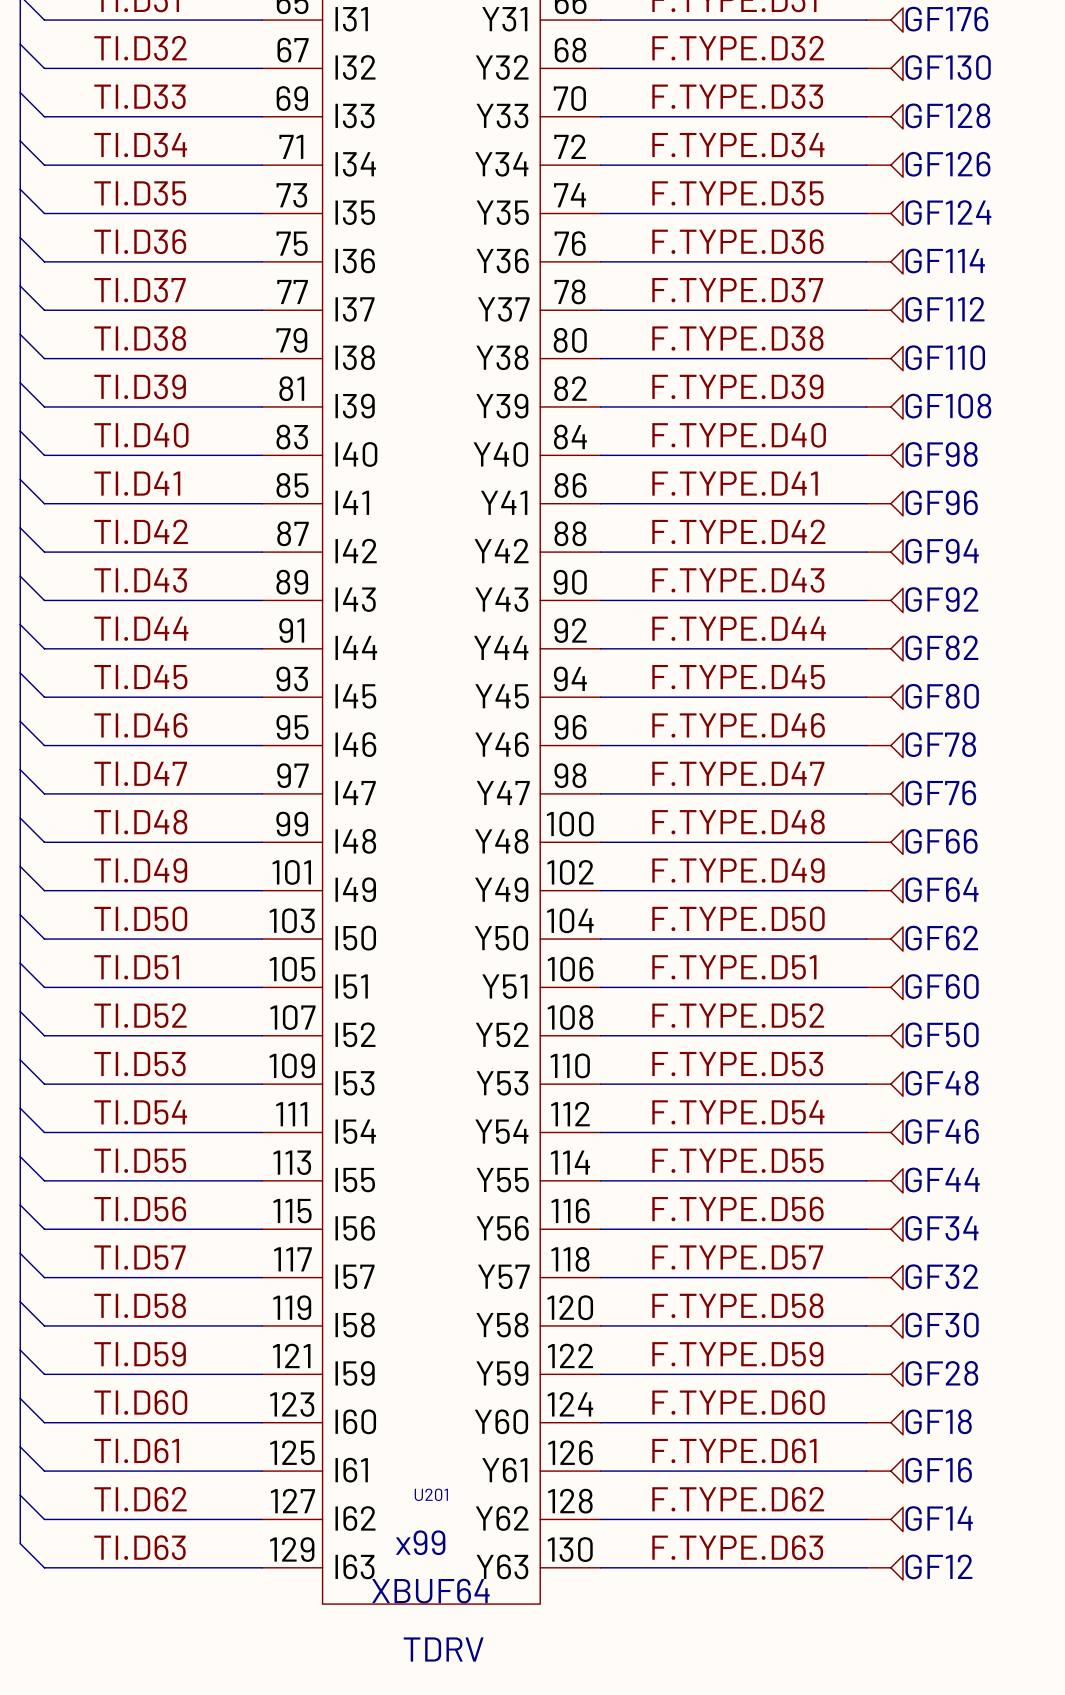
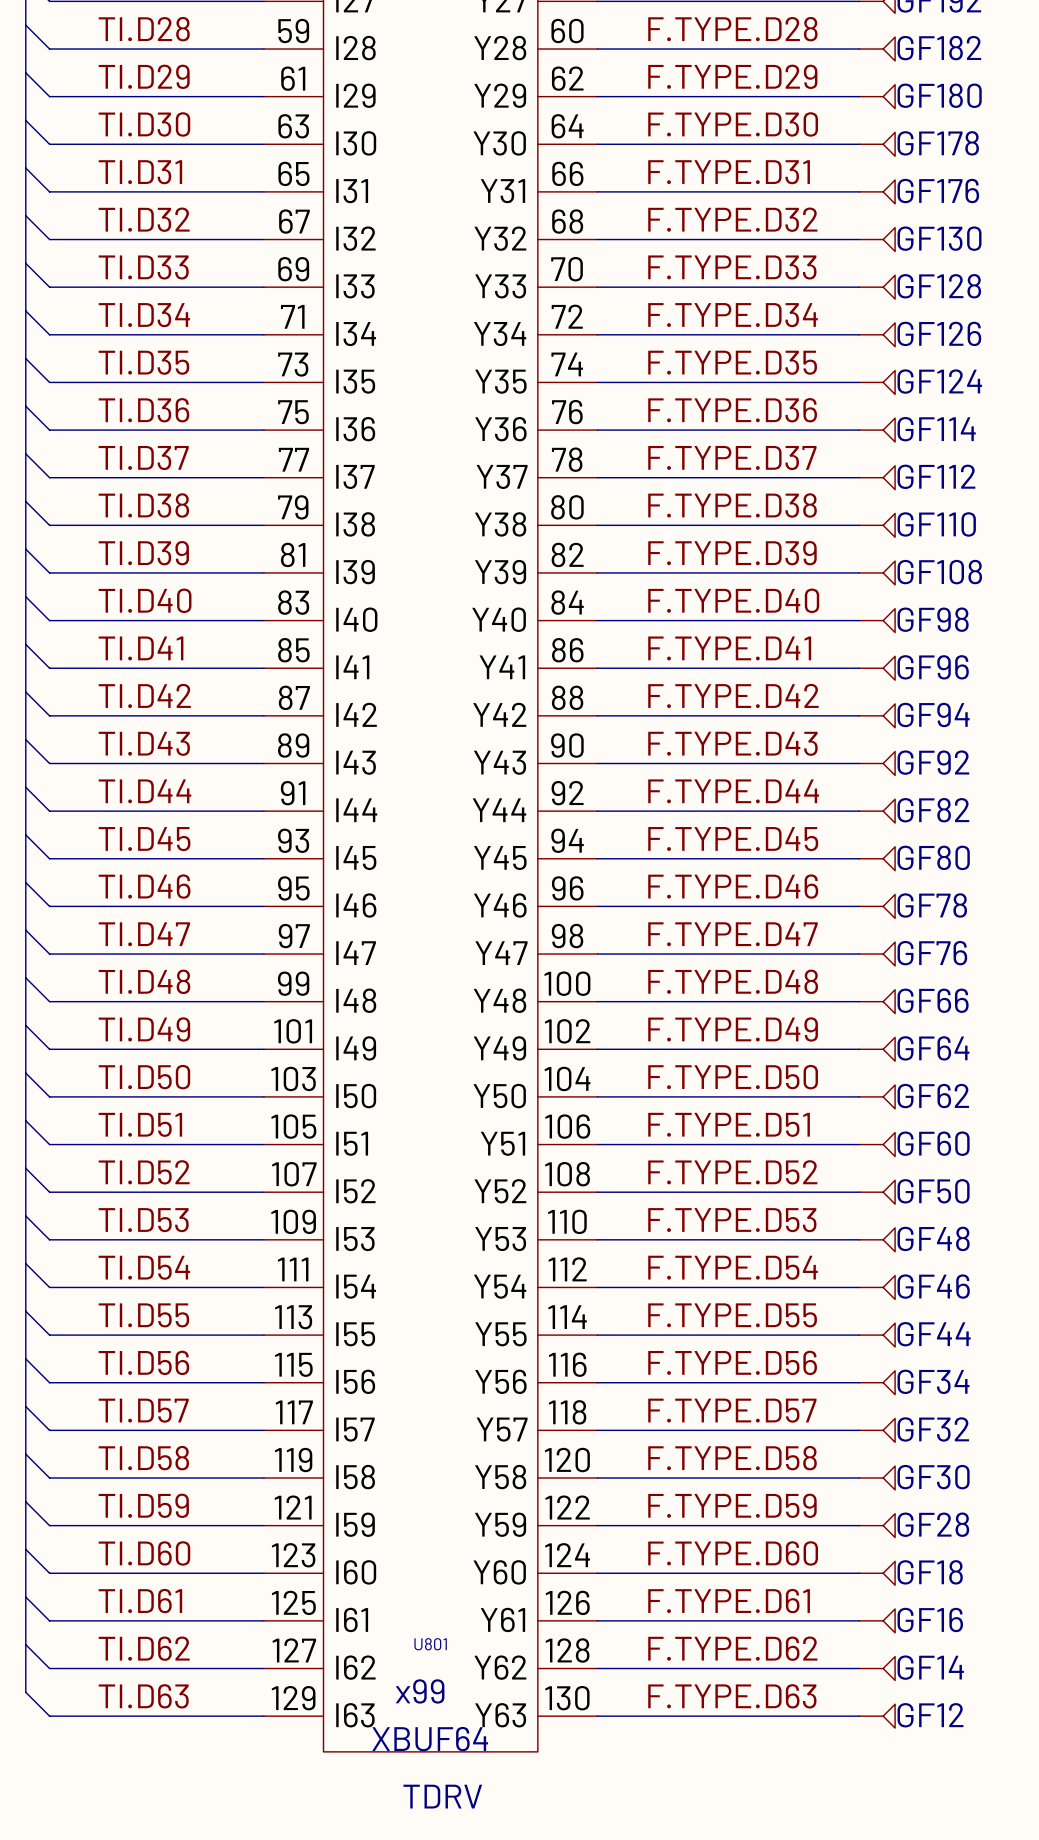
U201 name: U201 (431, 1494) -> U801 (430, 1644)

